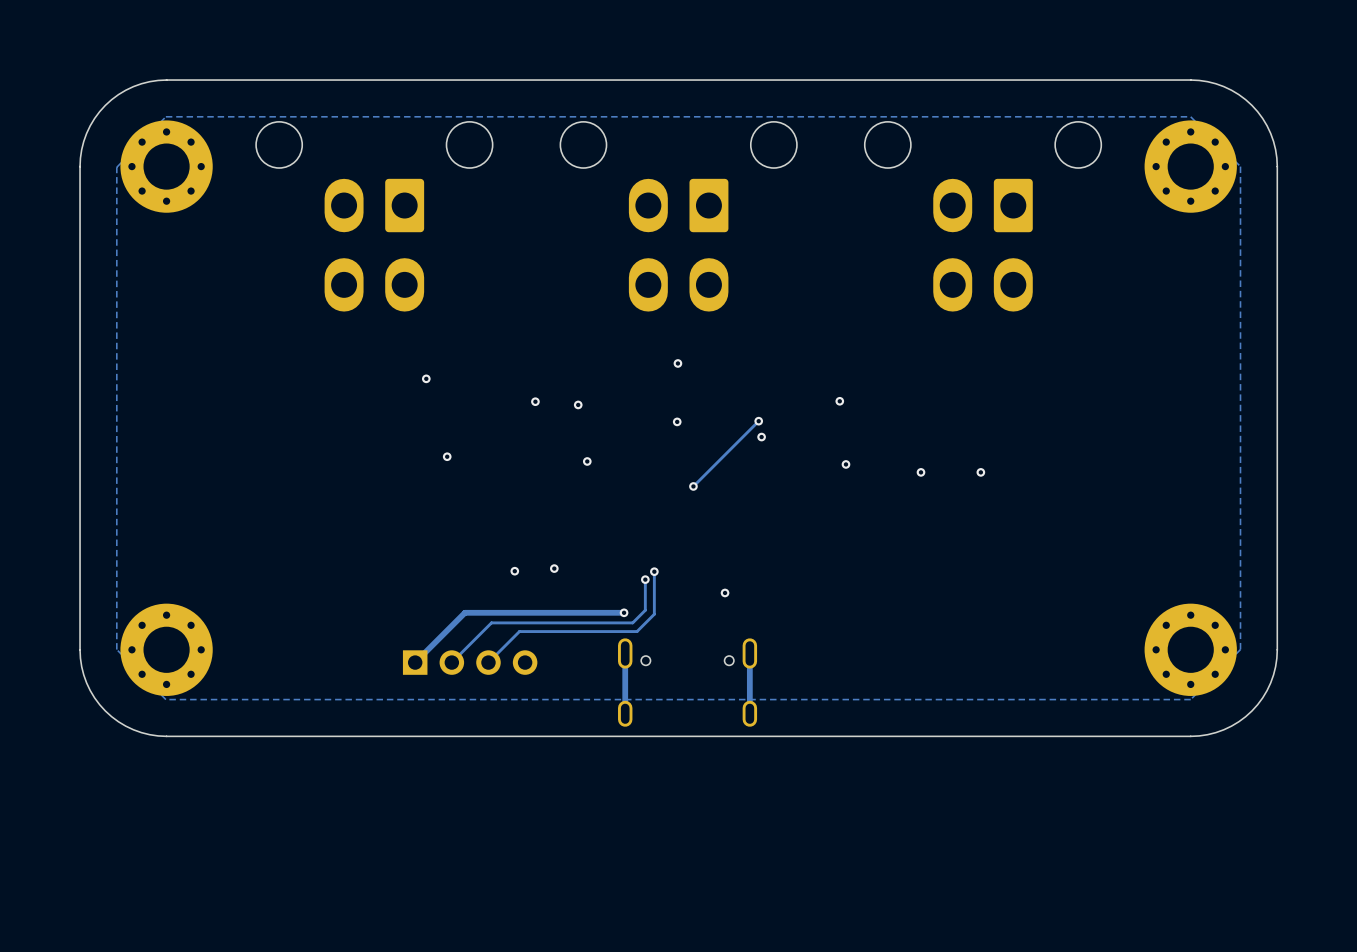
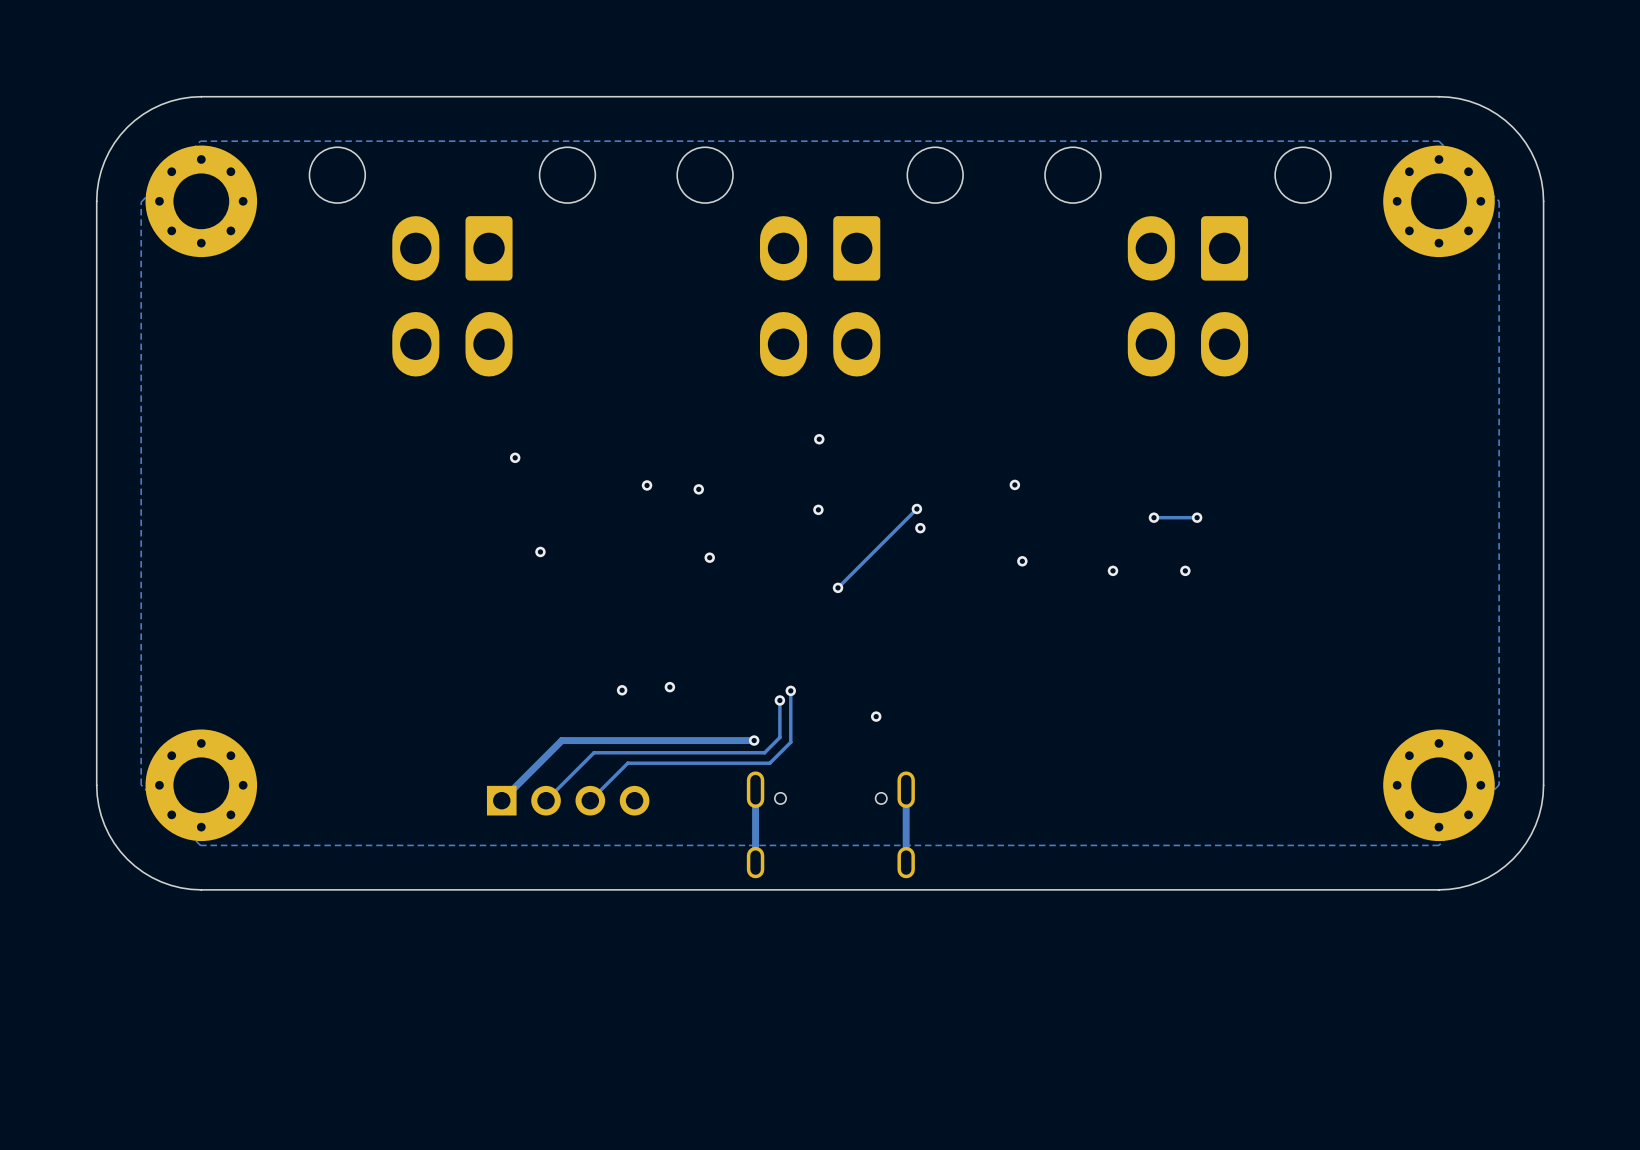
via: none -> (1153, 517)
track: none -> (1197, 517) (1153, 517)
via: none -> (1197, 517)

